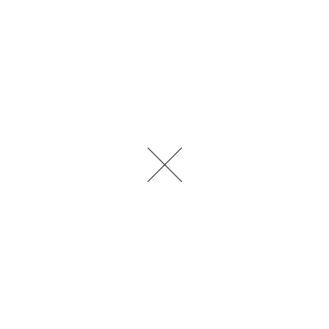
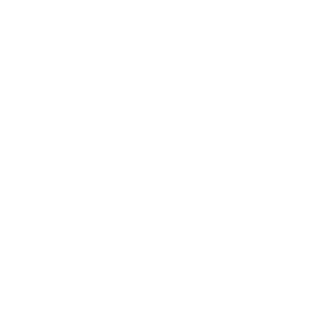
no-connect mark: (164, 164) -> none

